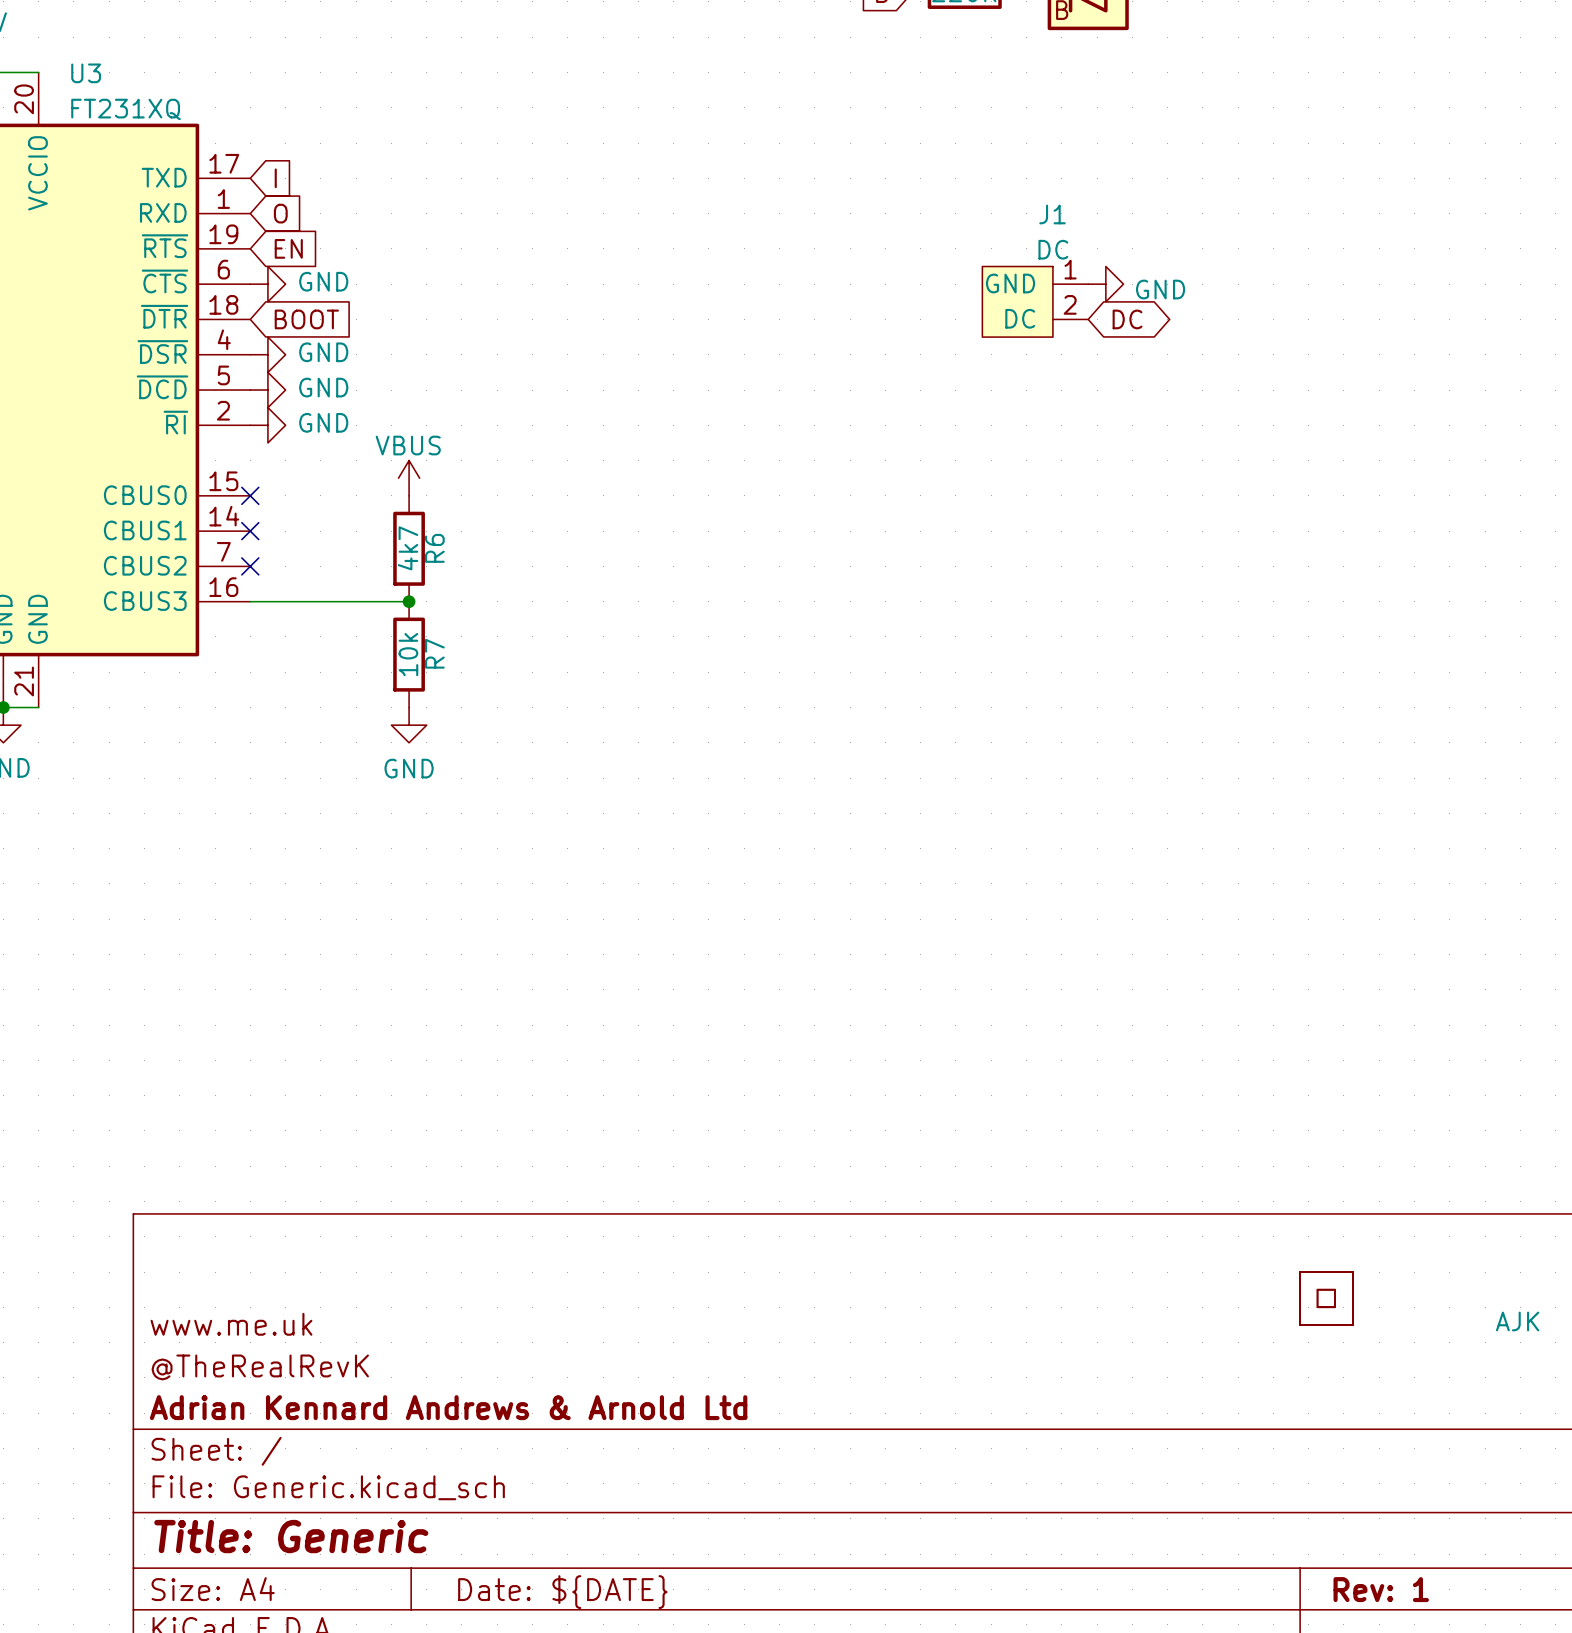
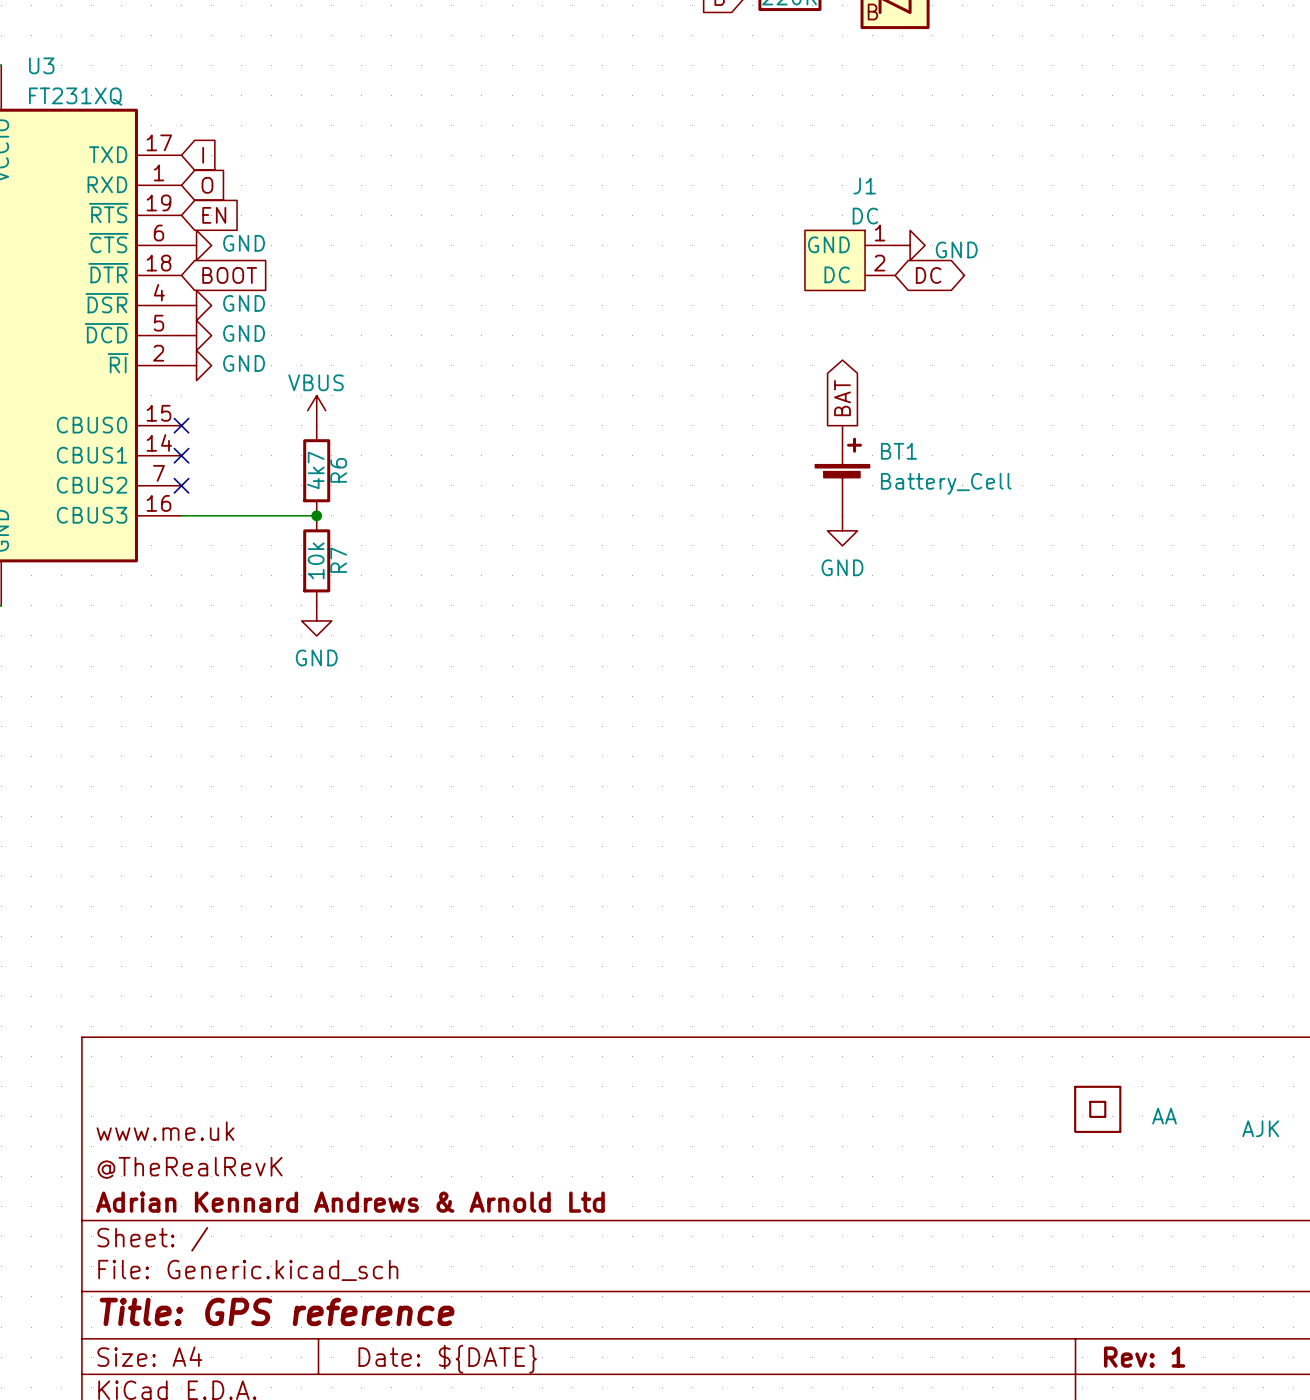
global label: none -> BAT (842, 398)
BT1: none -> Battery_Cell (842, 470)
power symbol: none -> GND (842, 530)
part: none -> AA (1164, 1116)
title block: Title: Generic (291, 1536) -> Title: GPS reference (277, 1311)

